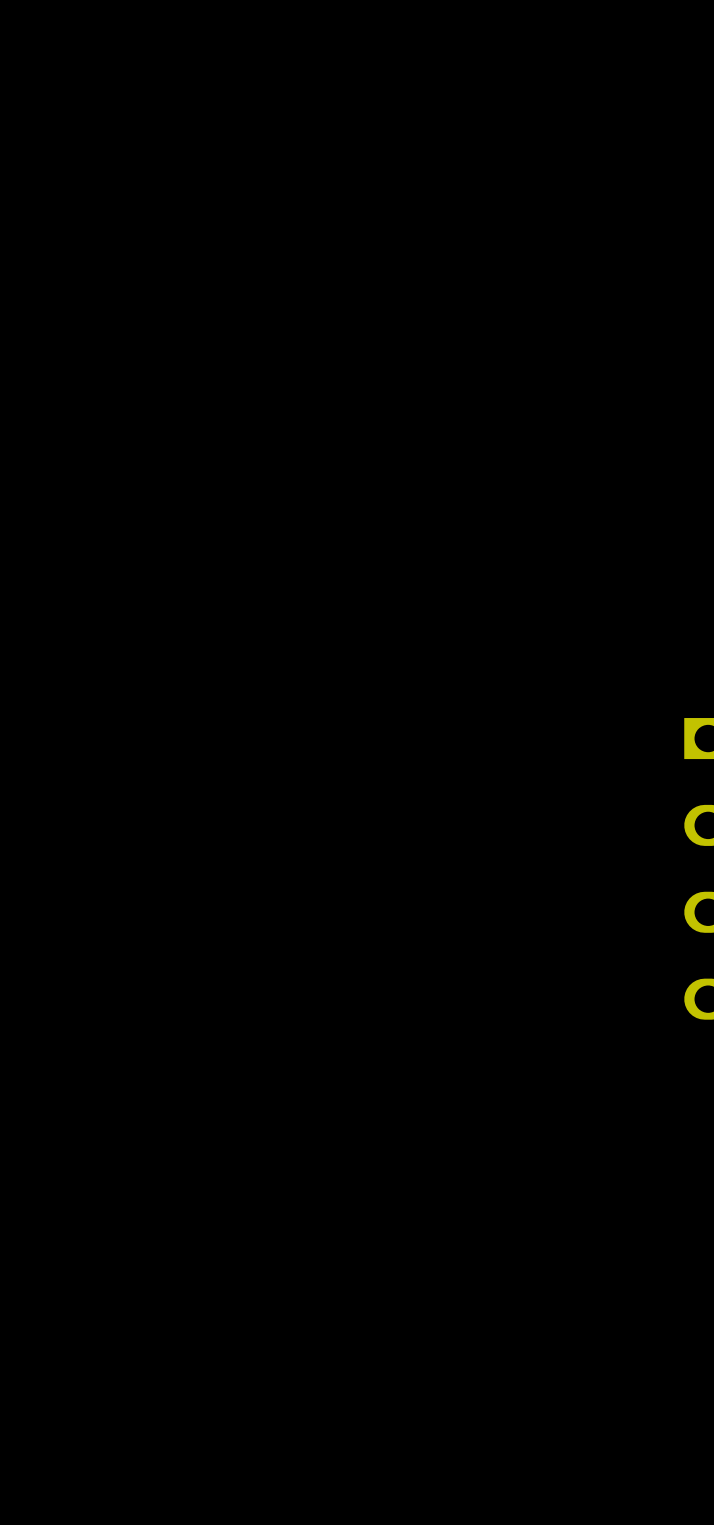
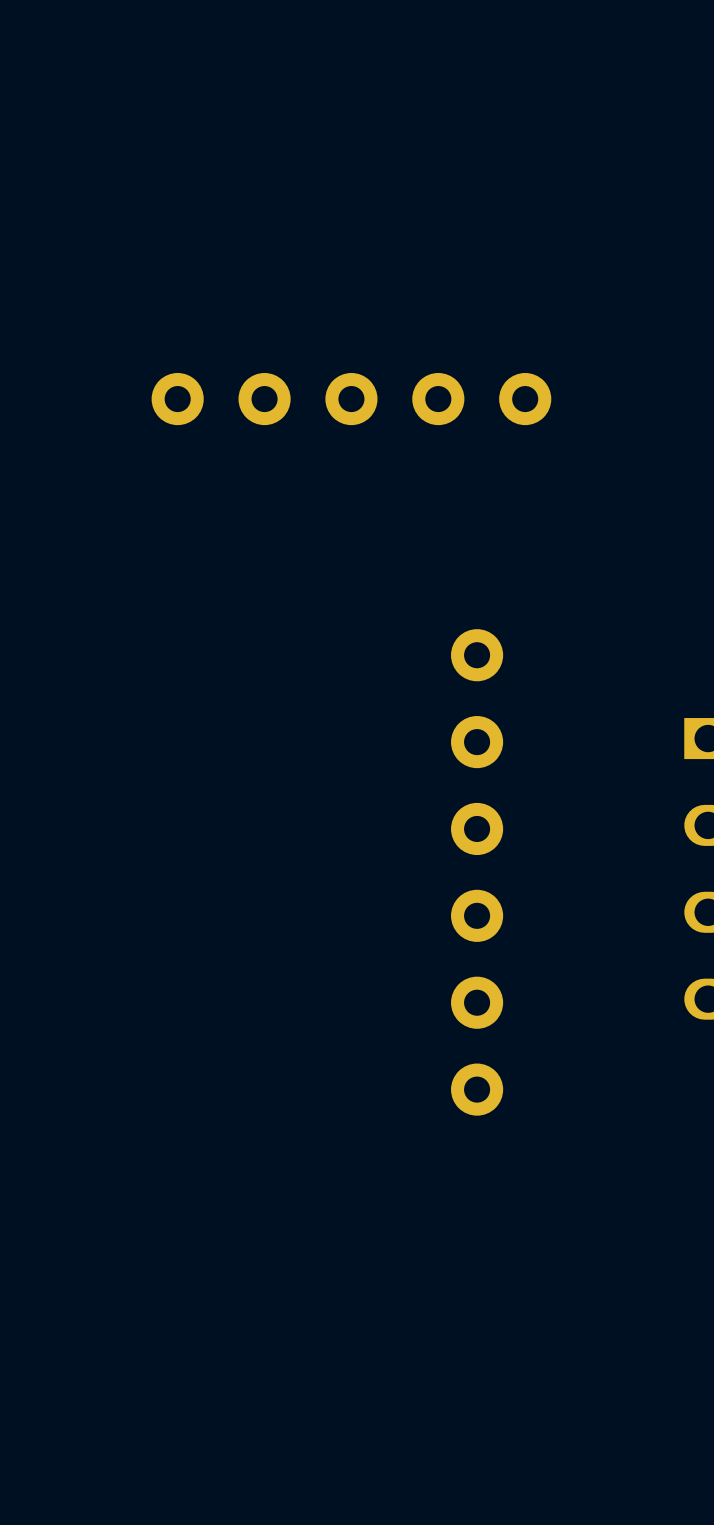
part: none -> (351, 399)
part: none -> (477, 872)

